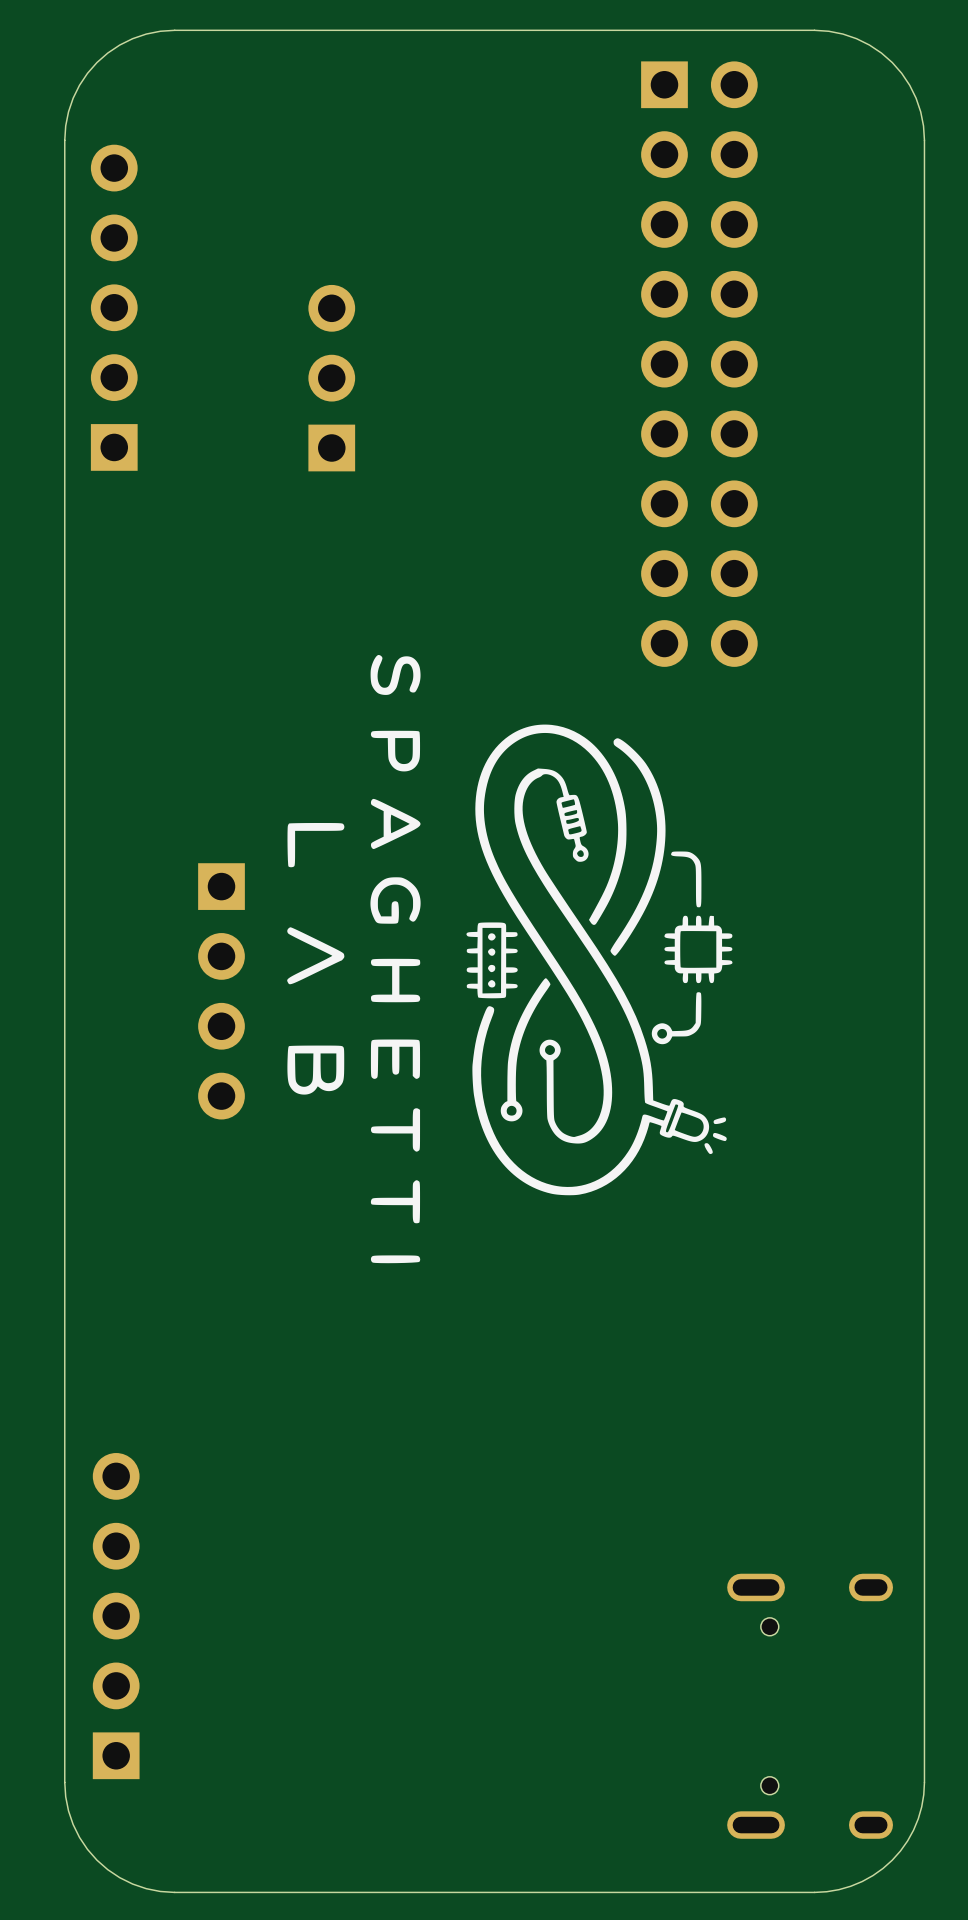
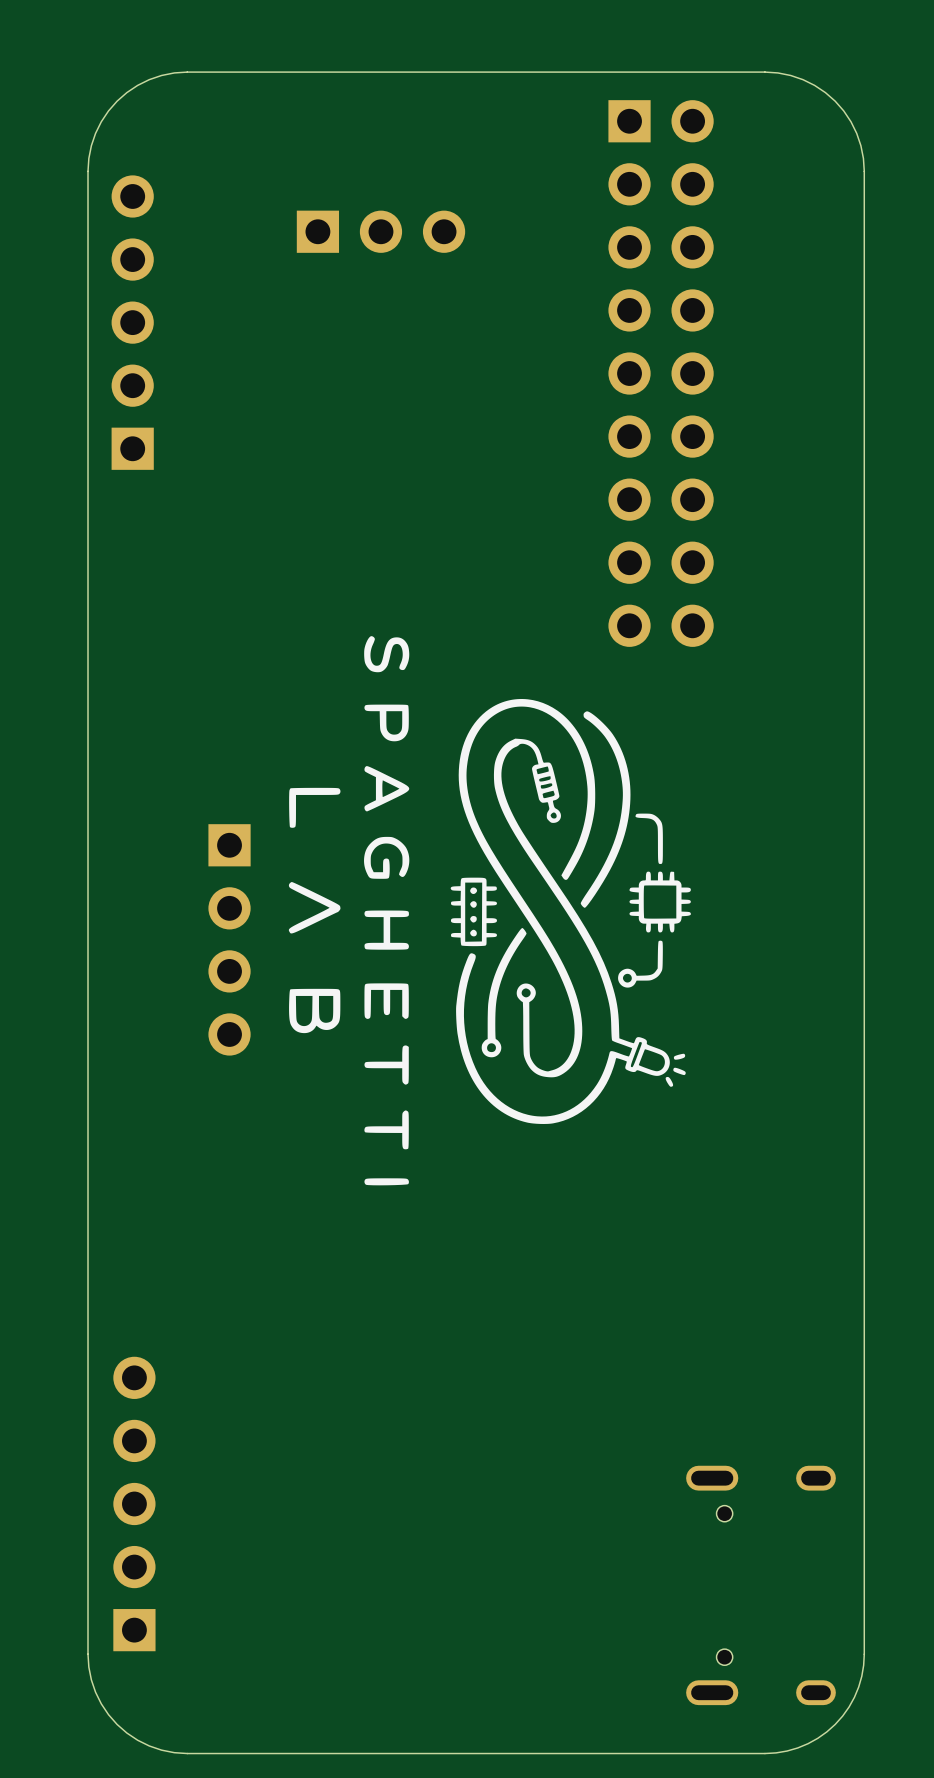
part rotation: 0° (331, 378) -> 90° clockwise (380, 231)
part position: (331, 378) -> (380, 231)

